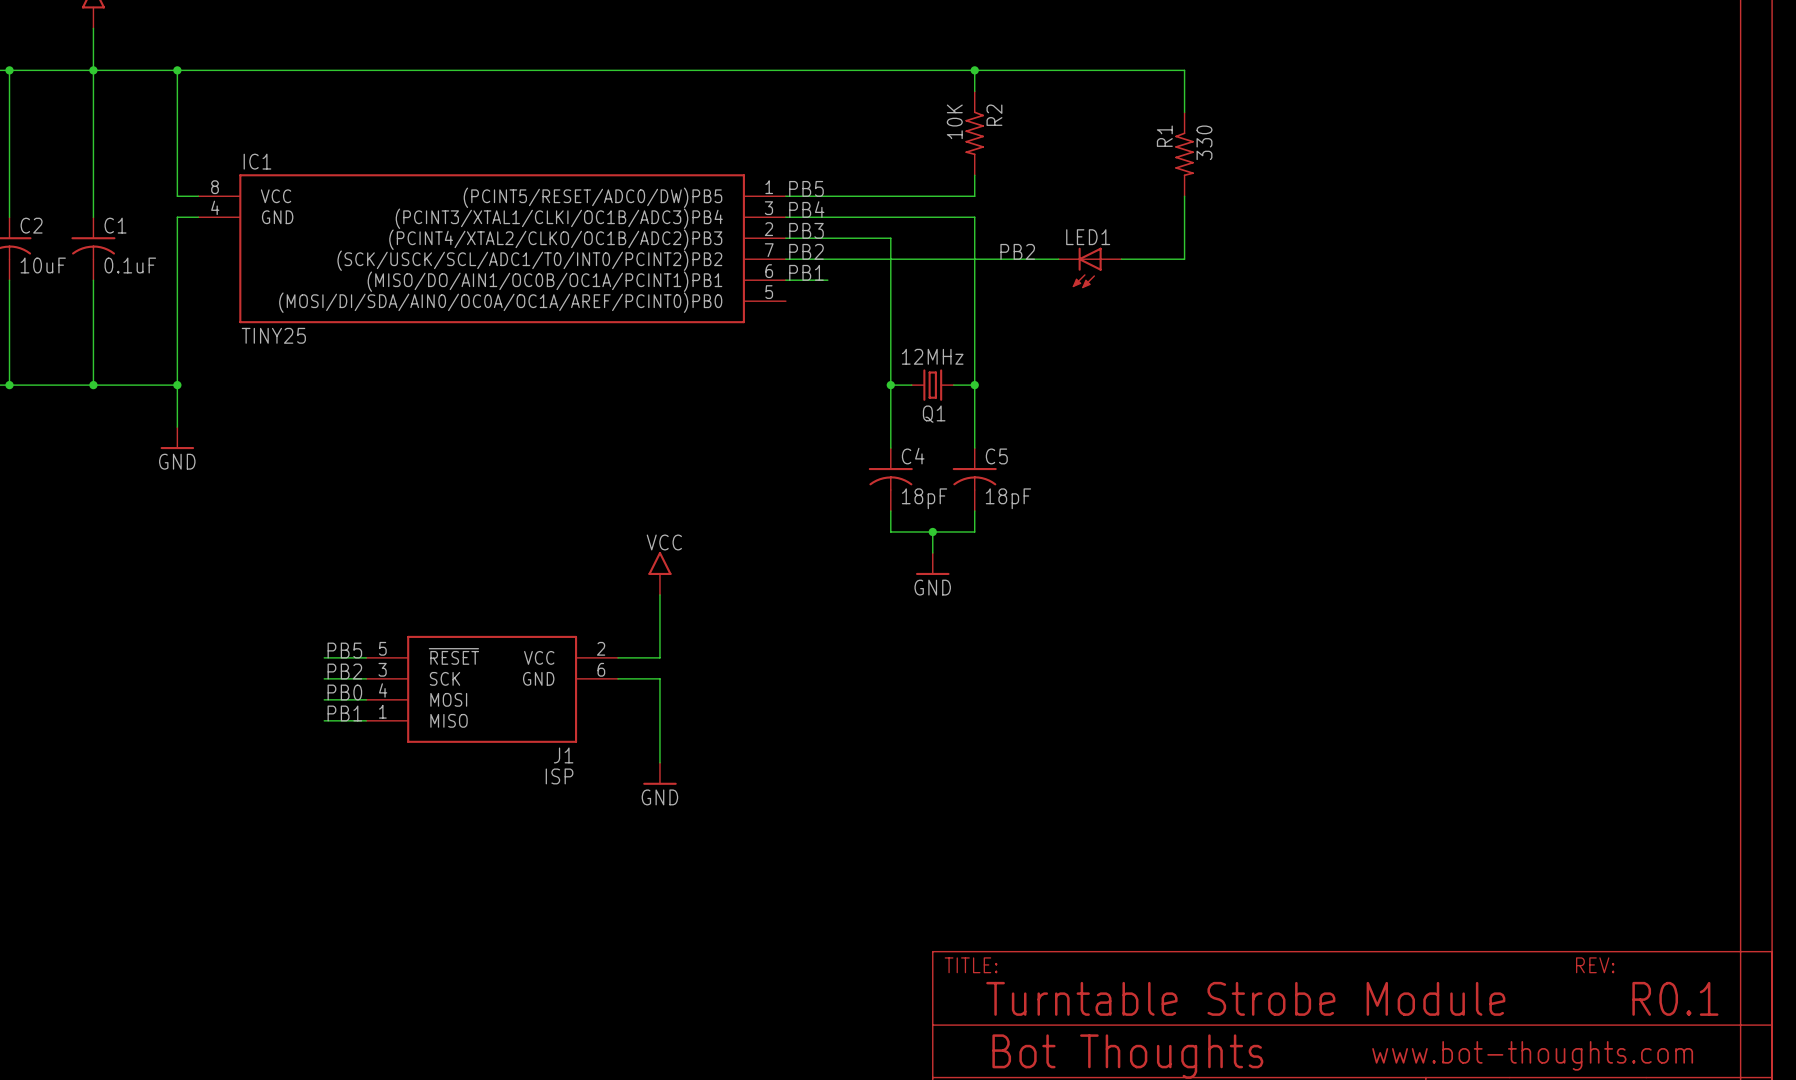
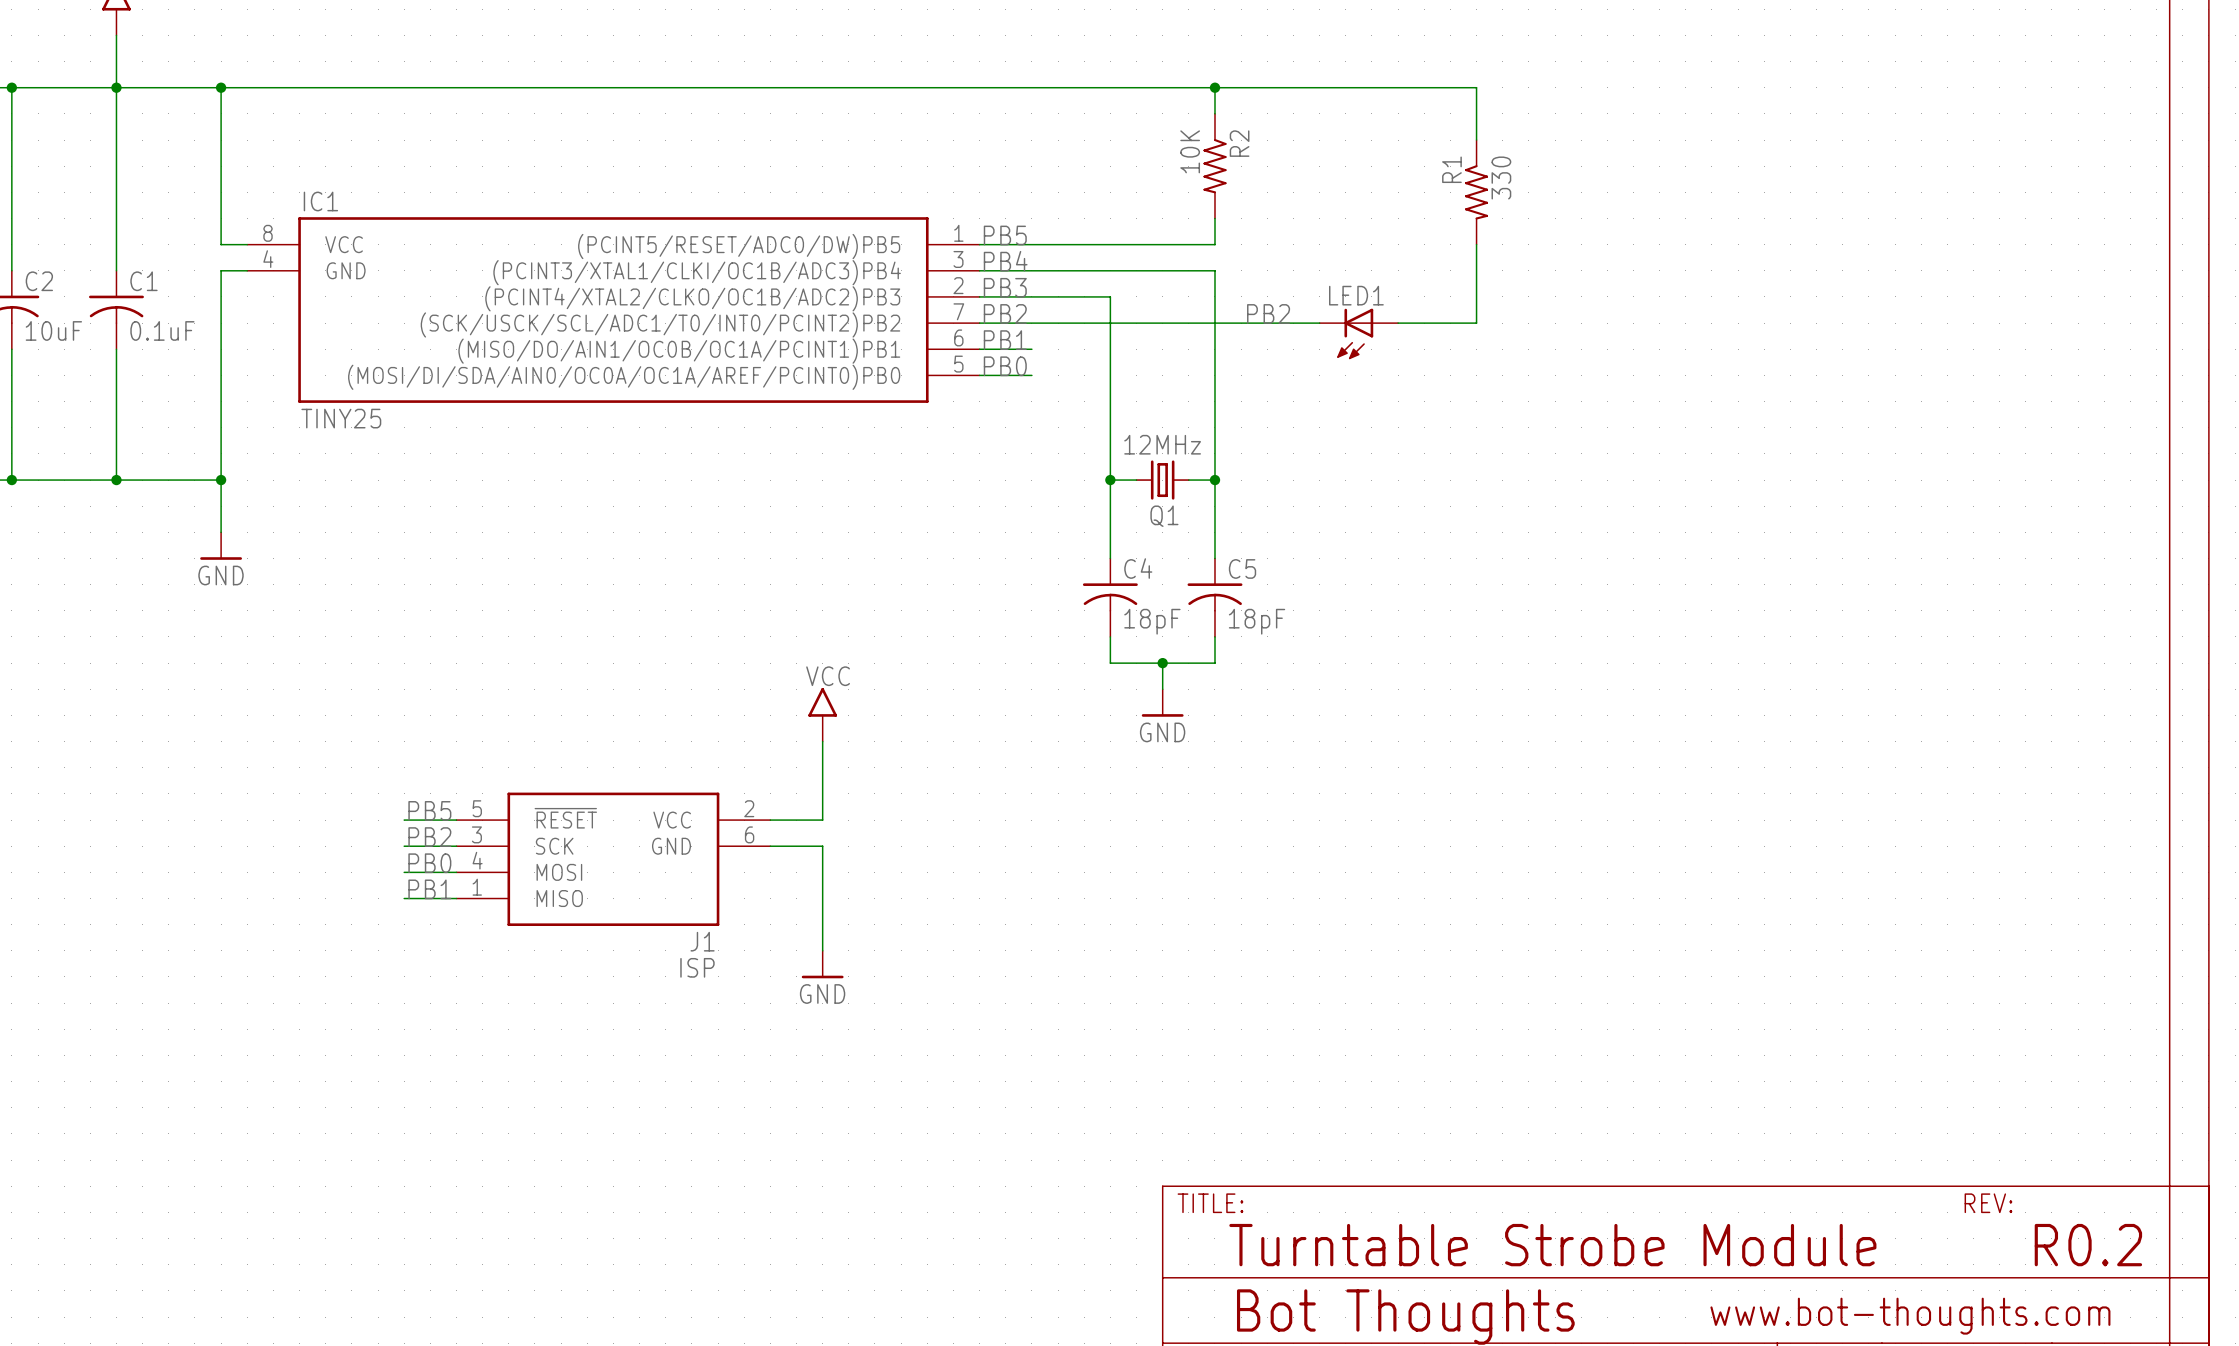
label: none -> PB0 (1005, 366)
wire: none -> (979, 375) (1031, 375)
text: R0.1 (1675, 998) -> R0.2 (2088, 1245)

